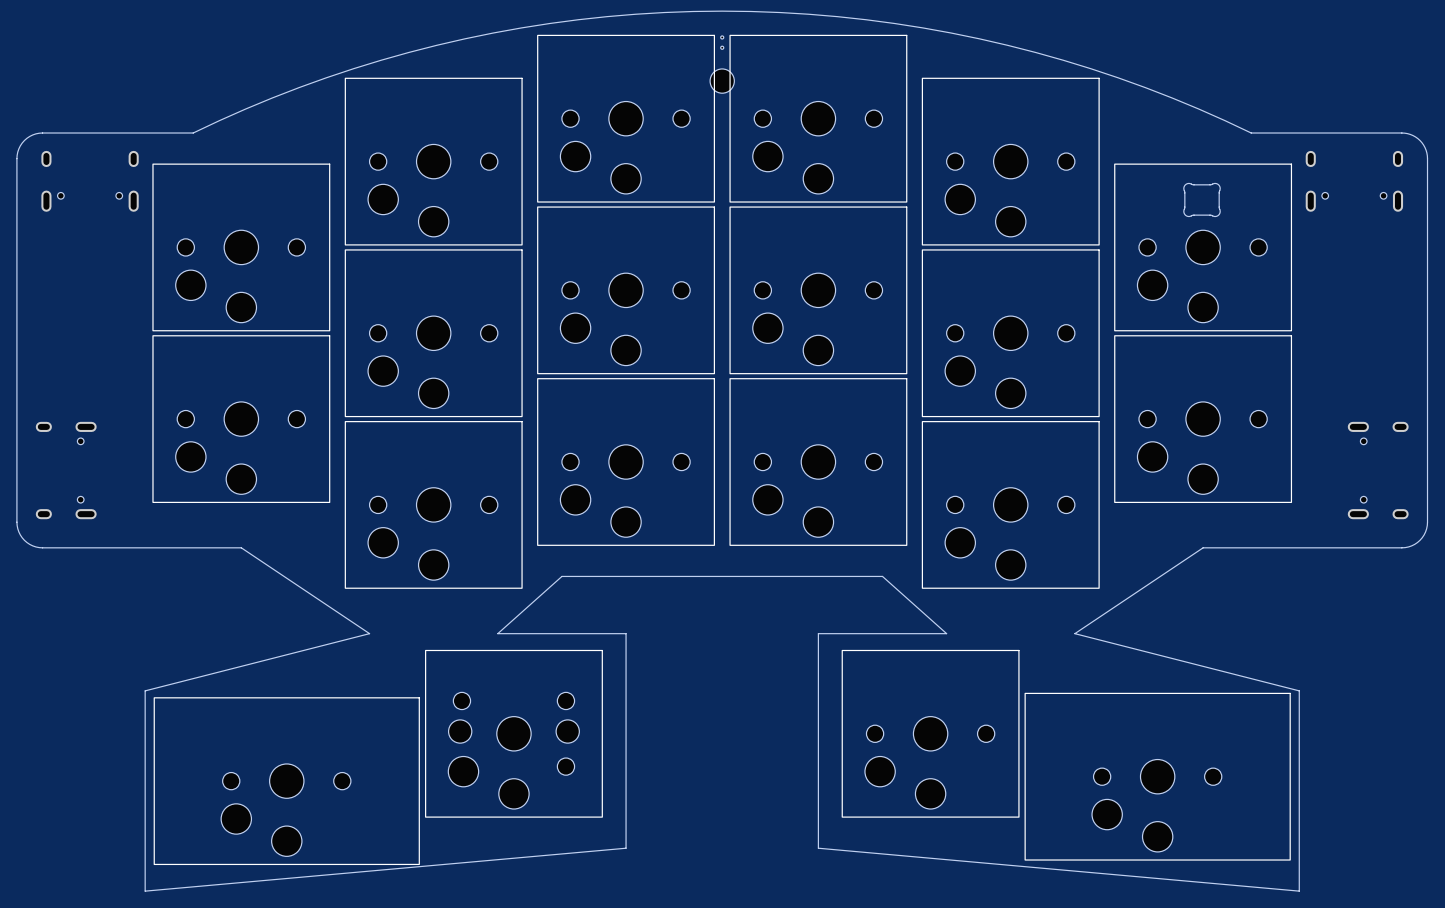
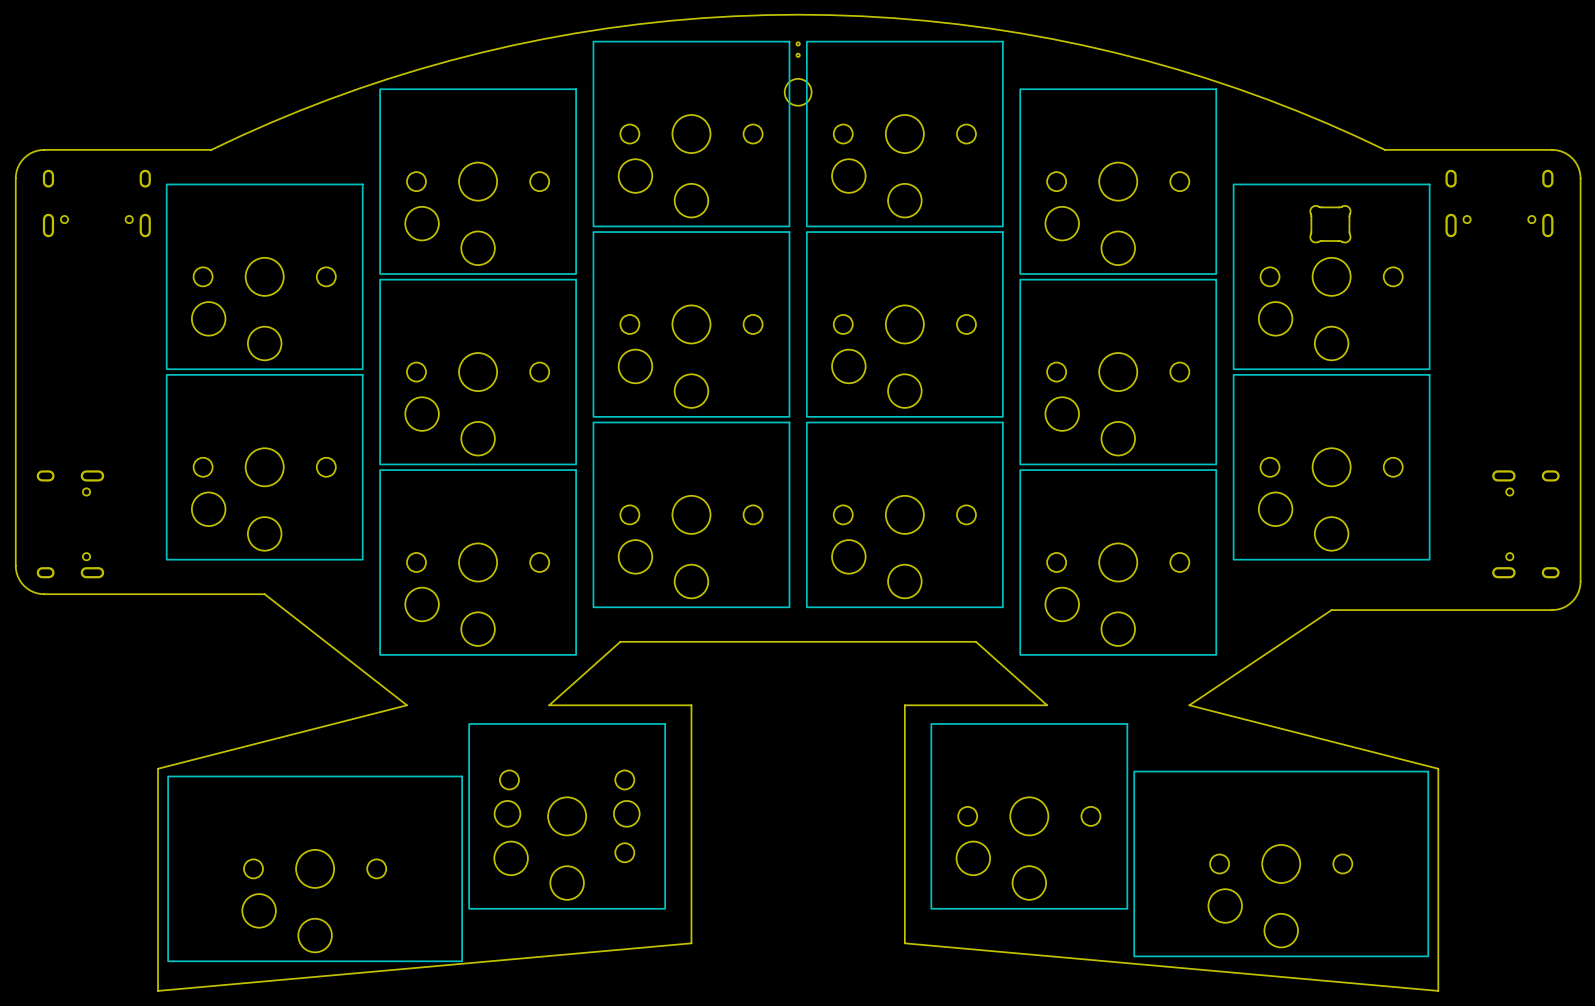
board edge: (16, 507) (17, 525) (20, 535) (26, 542) (39, 547) (241, 547) (369, 633) -> (15, 565) (17, 576) (24, 585) (40, 593) (264, 594) (406, 705)

